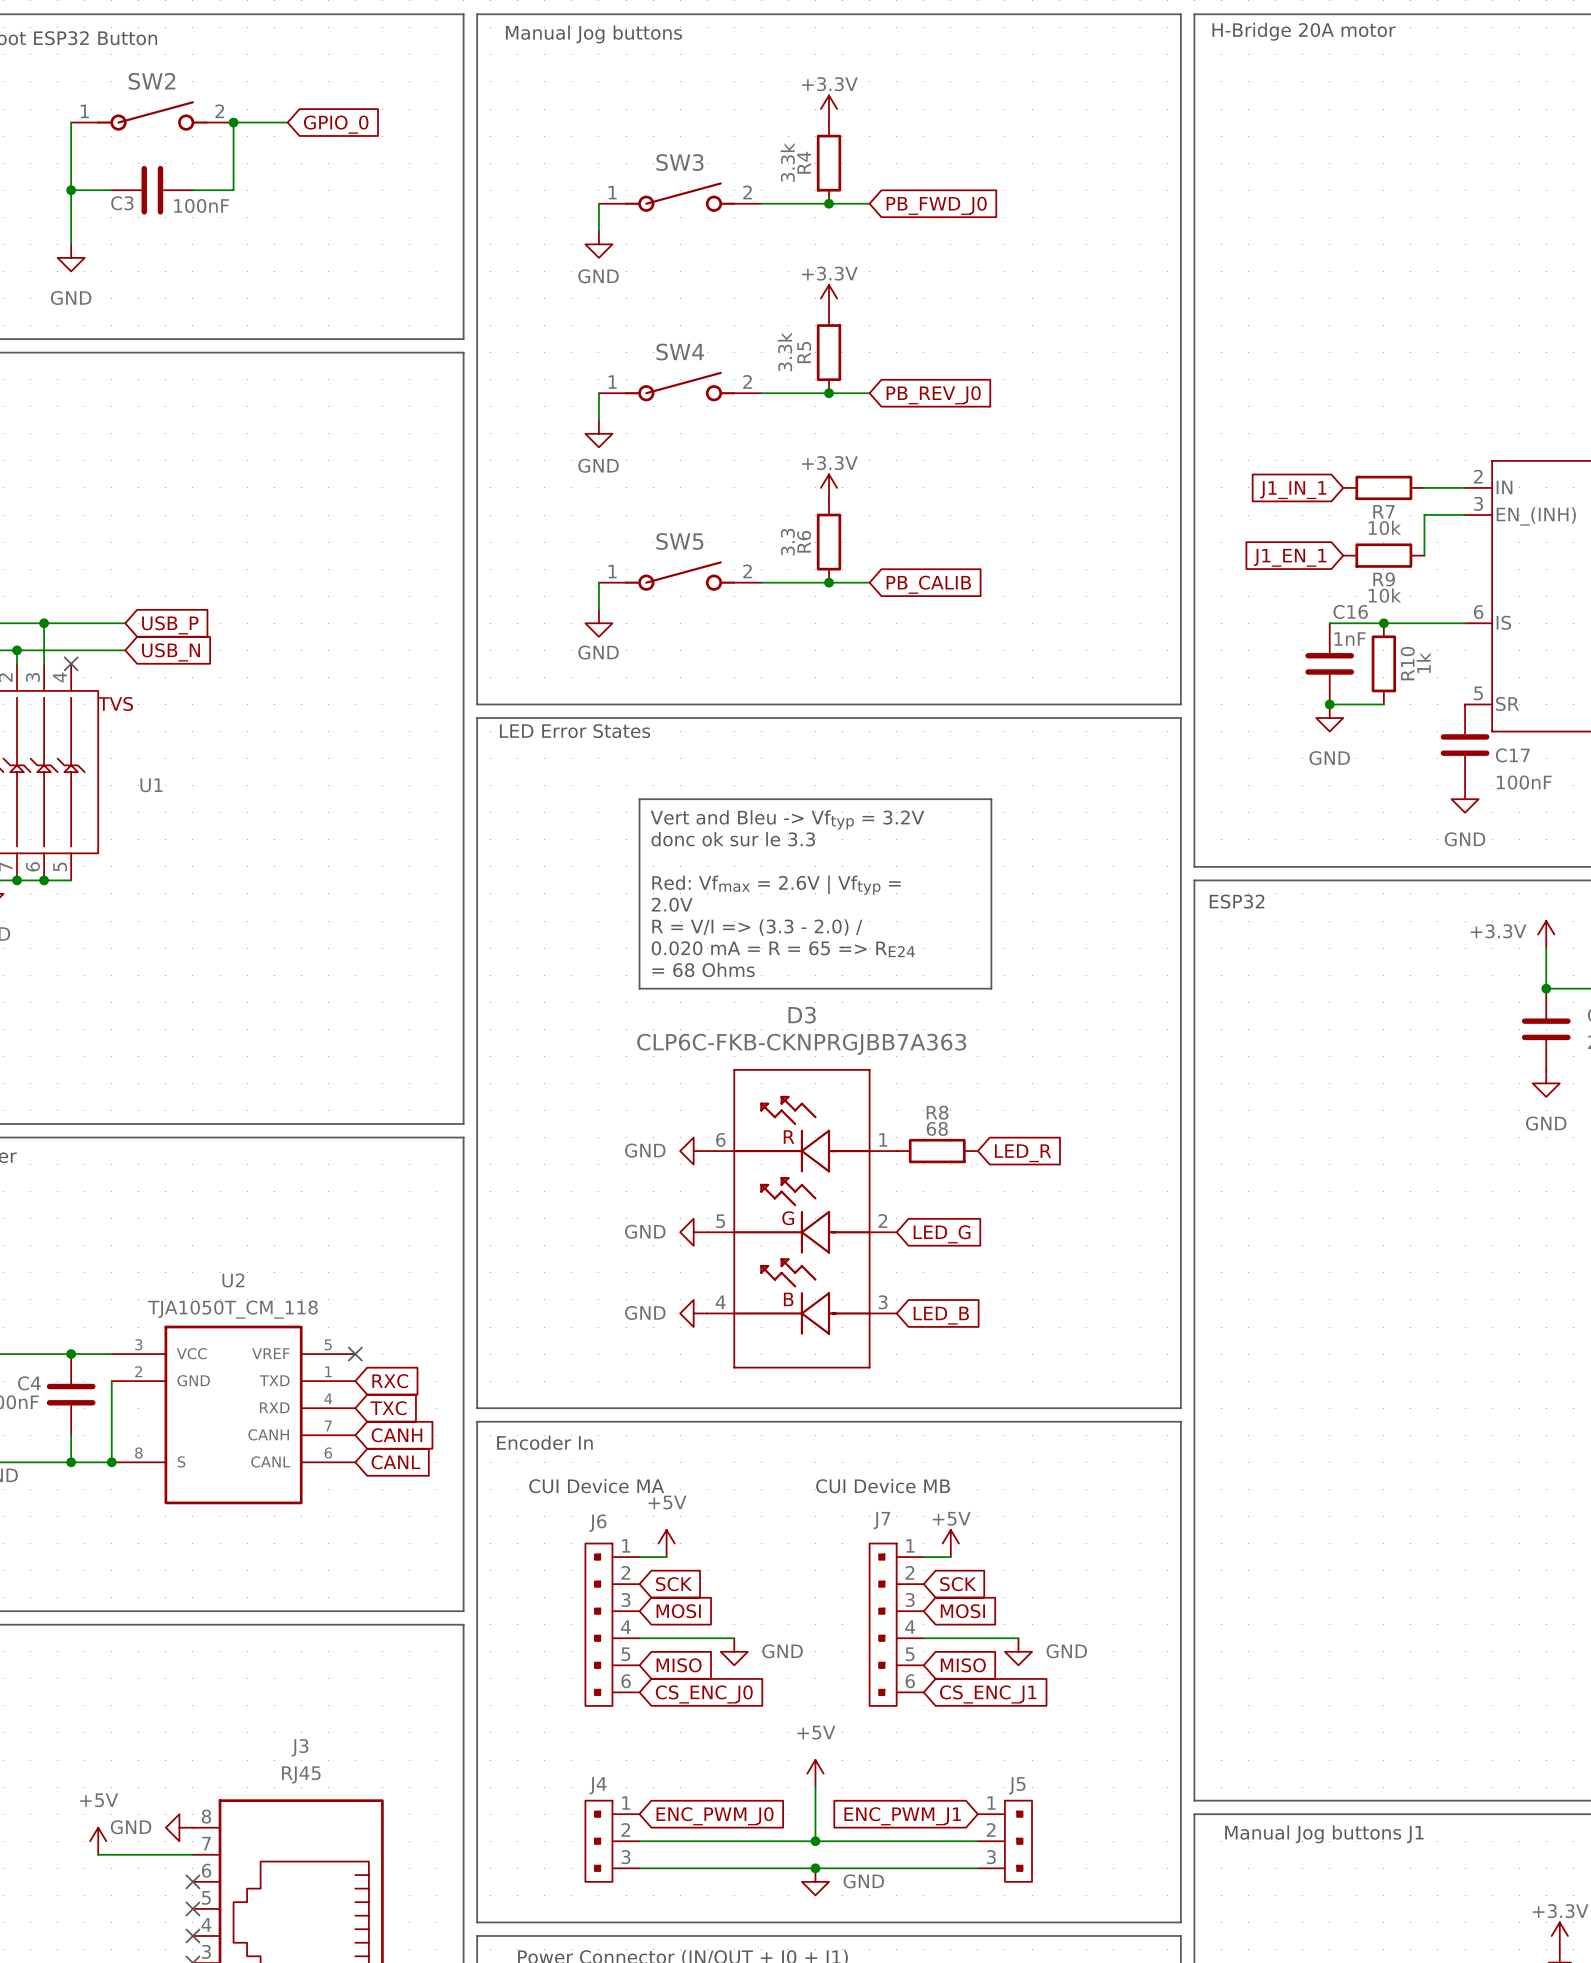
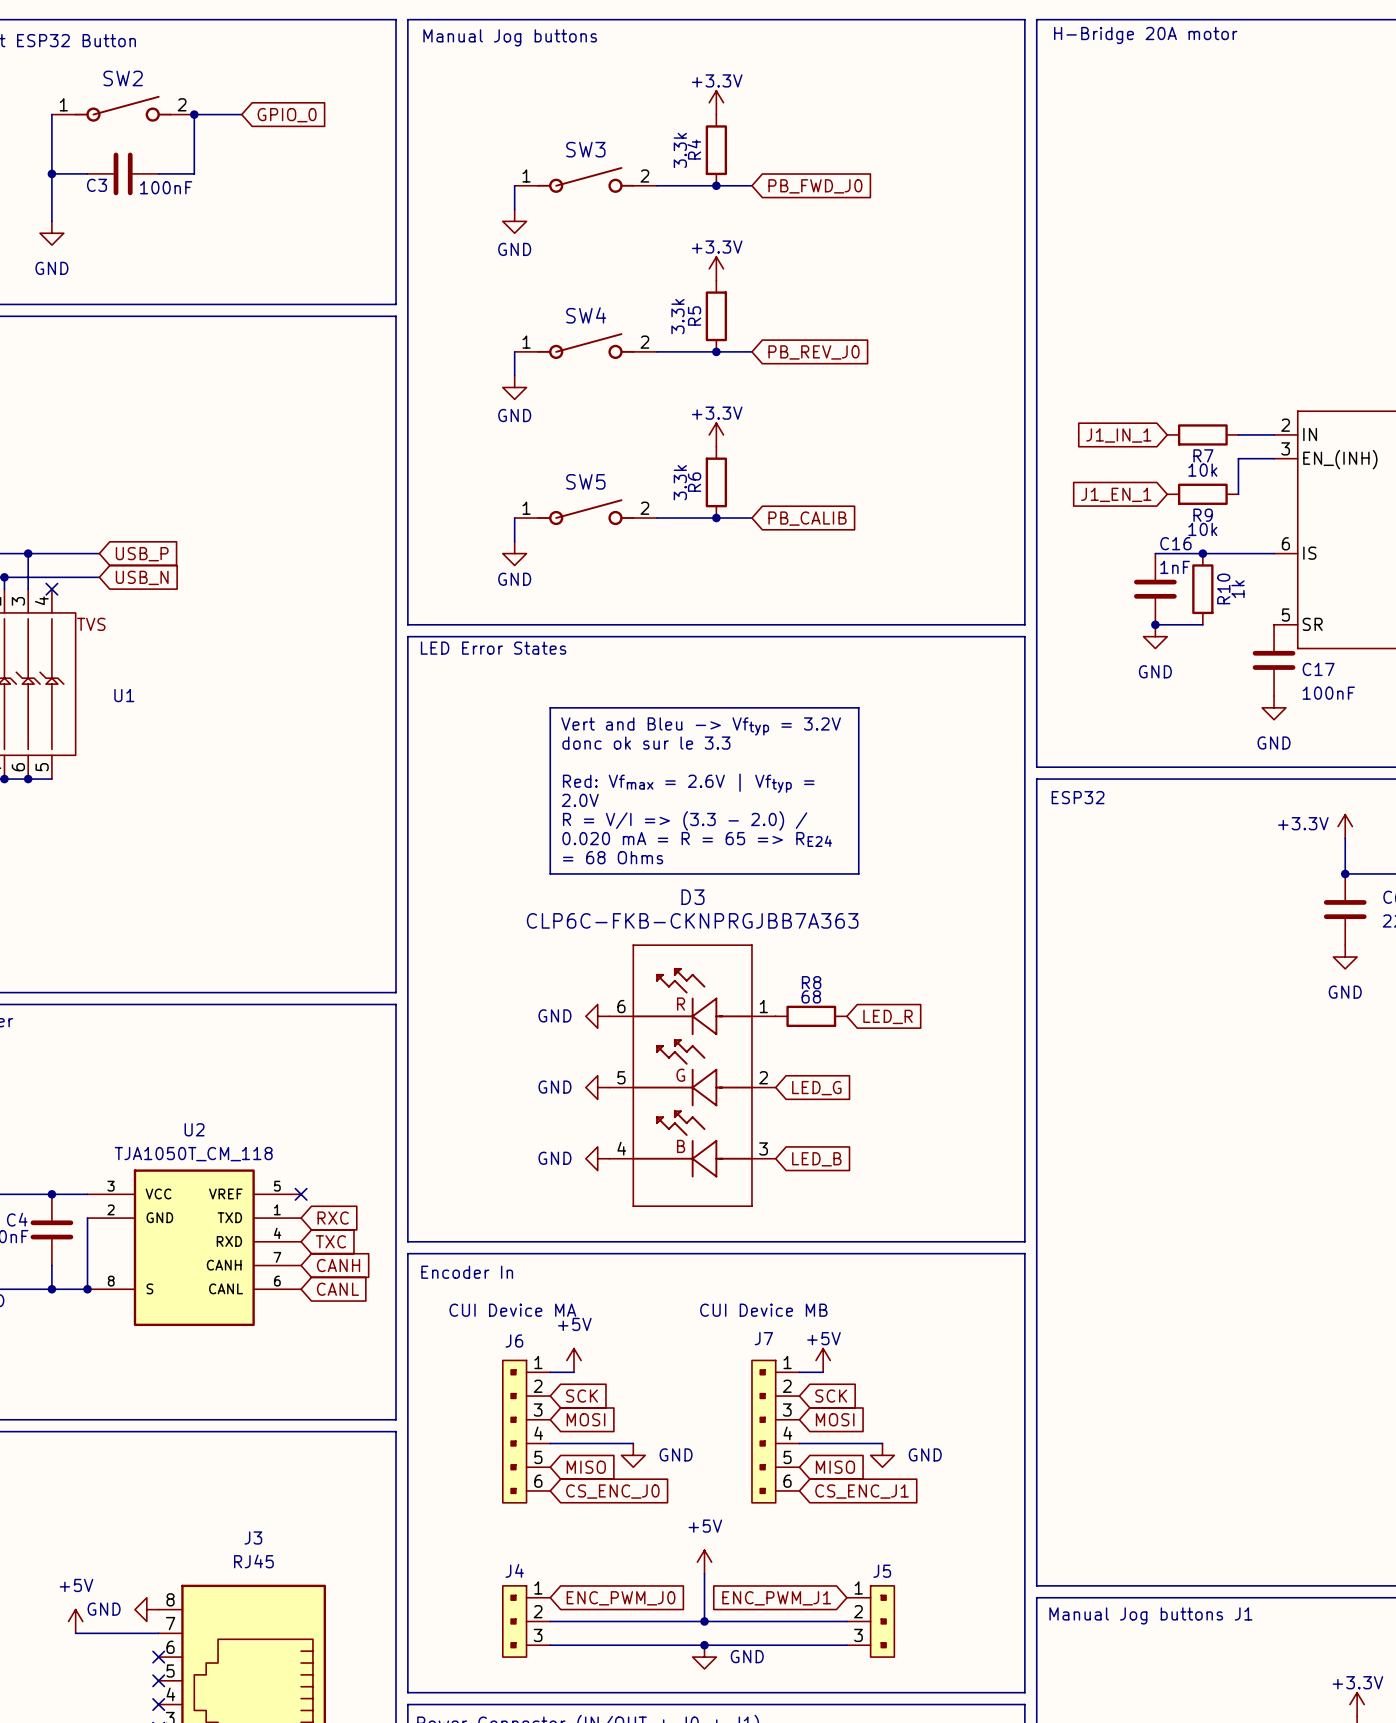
R6 value: 3.3 (787, 542) -> 3.3k (680, 482)

